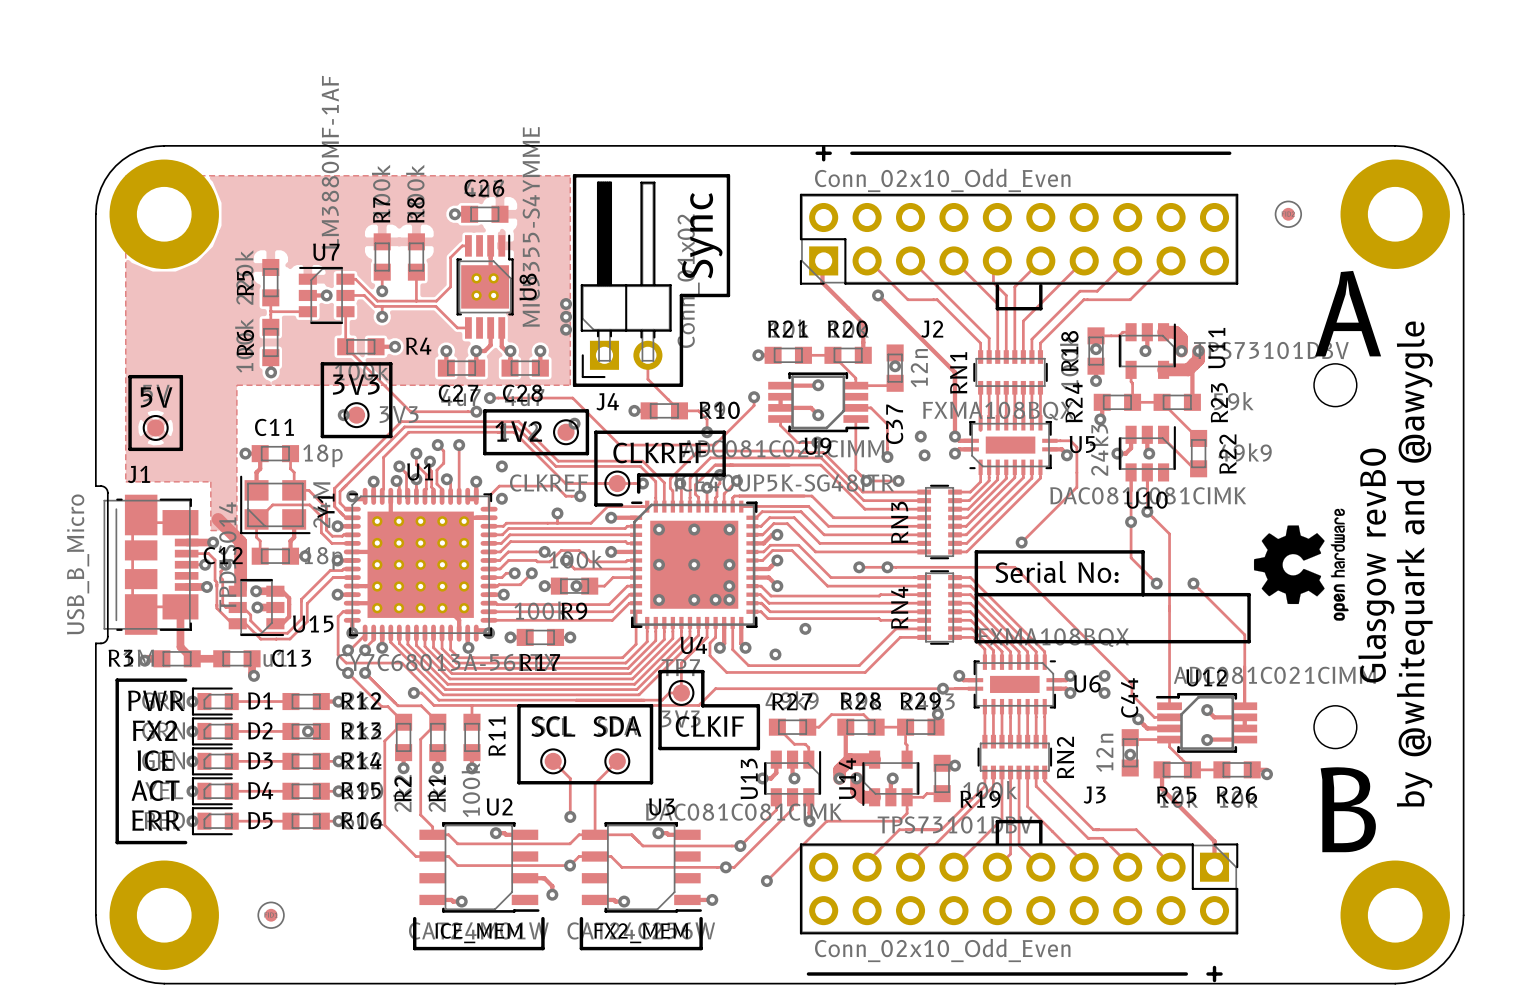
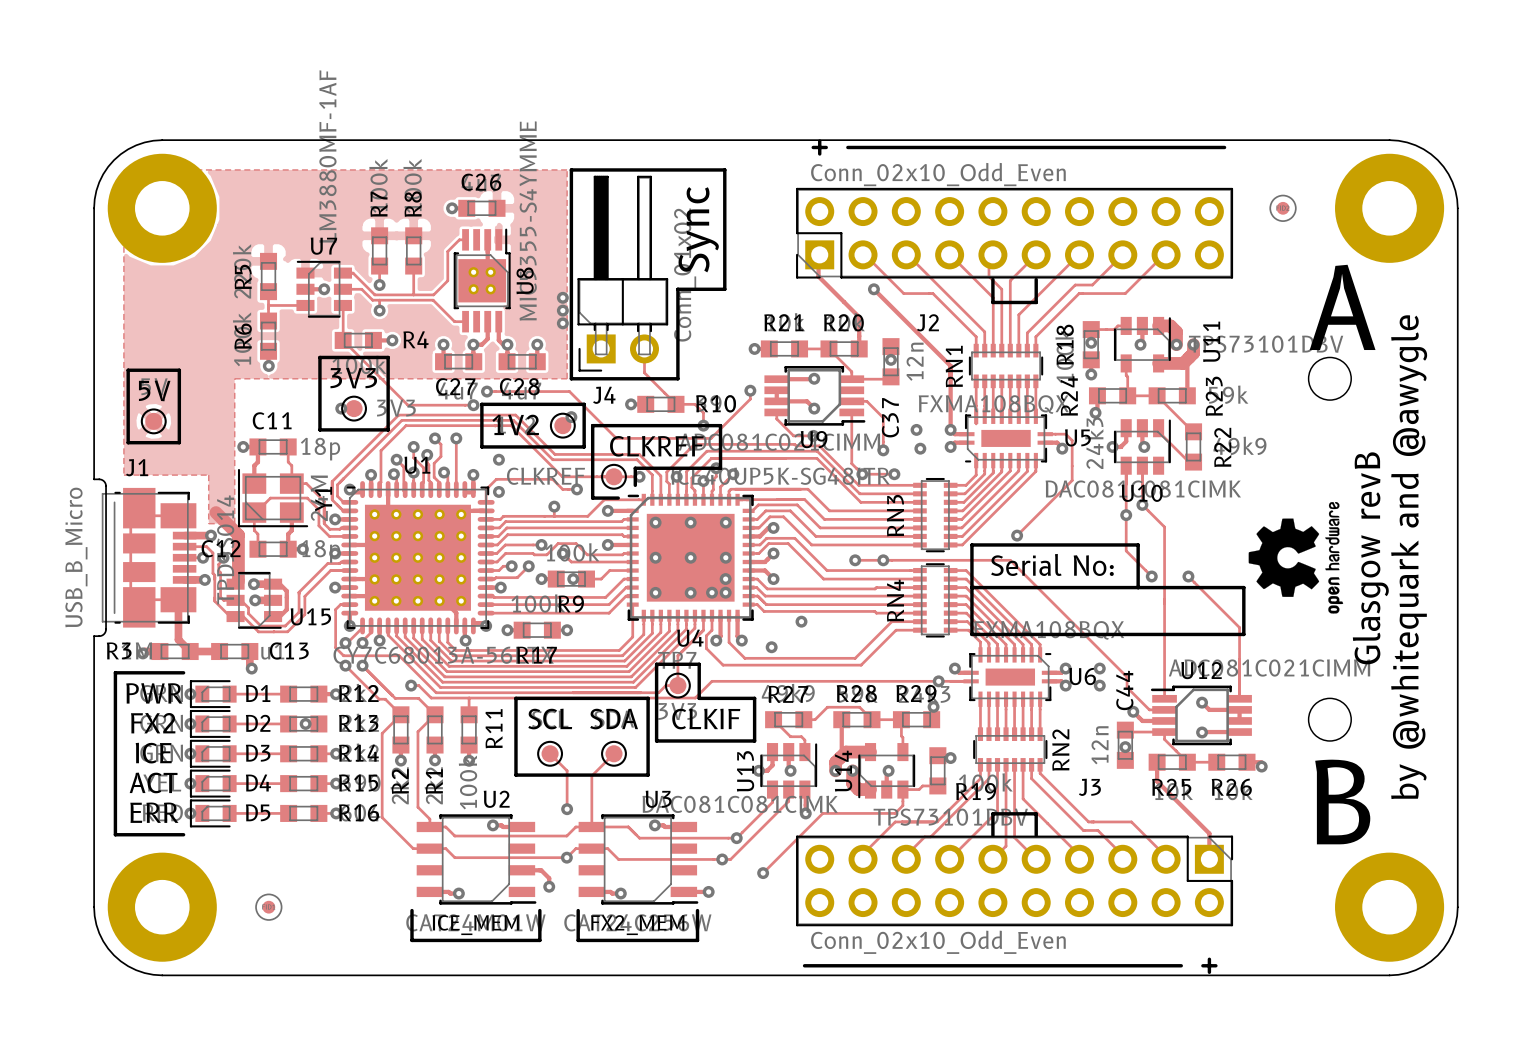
text: Glasgow revB0 (1376, 565) -> Glasgow revB (1370, 558)

